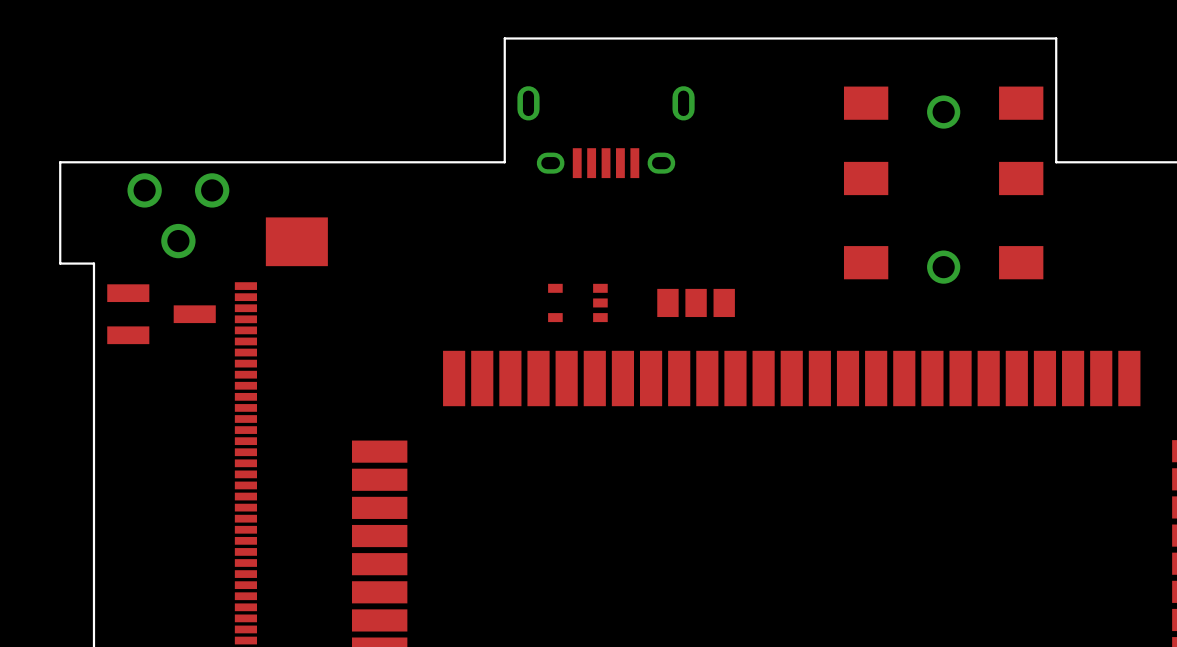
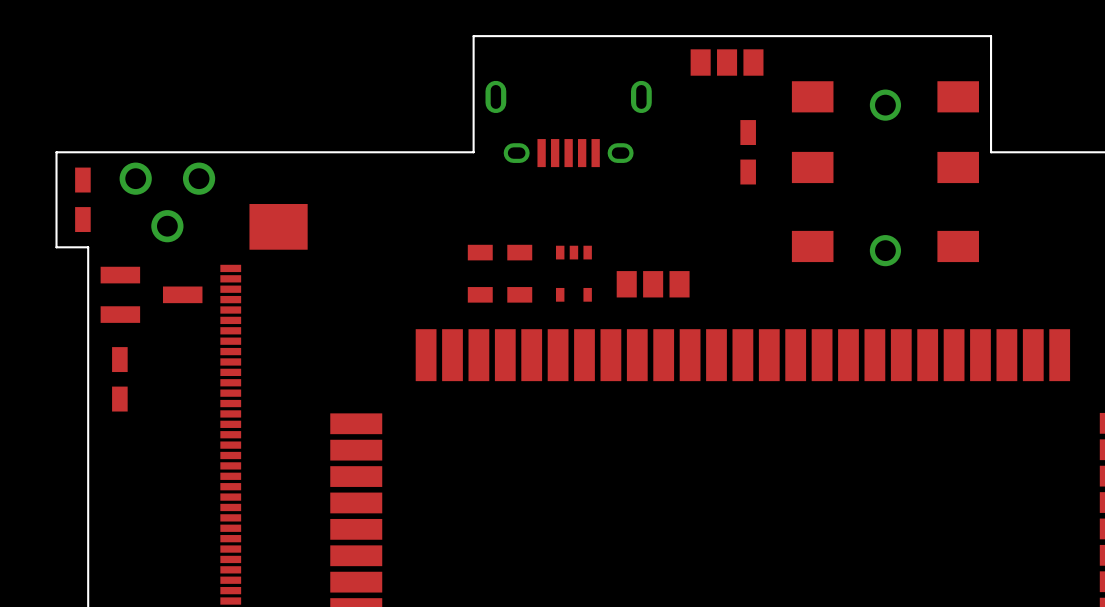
part: none -> (727, 62)
part: none -> (748, 152)
part: none -> (82, 199)
part: none -> (500, 252)
part rotation: 0° (577, 302) -> 90° counterclockwise (573, 273)
part: none -> (500, 294)
part: none -> (119, 379)

